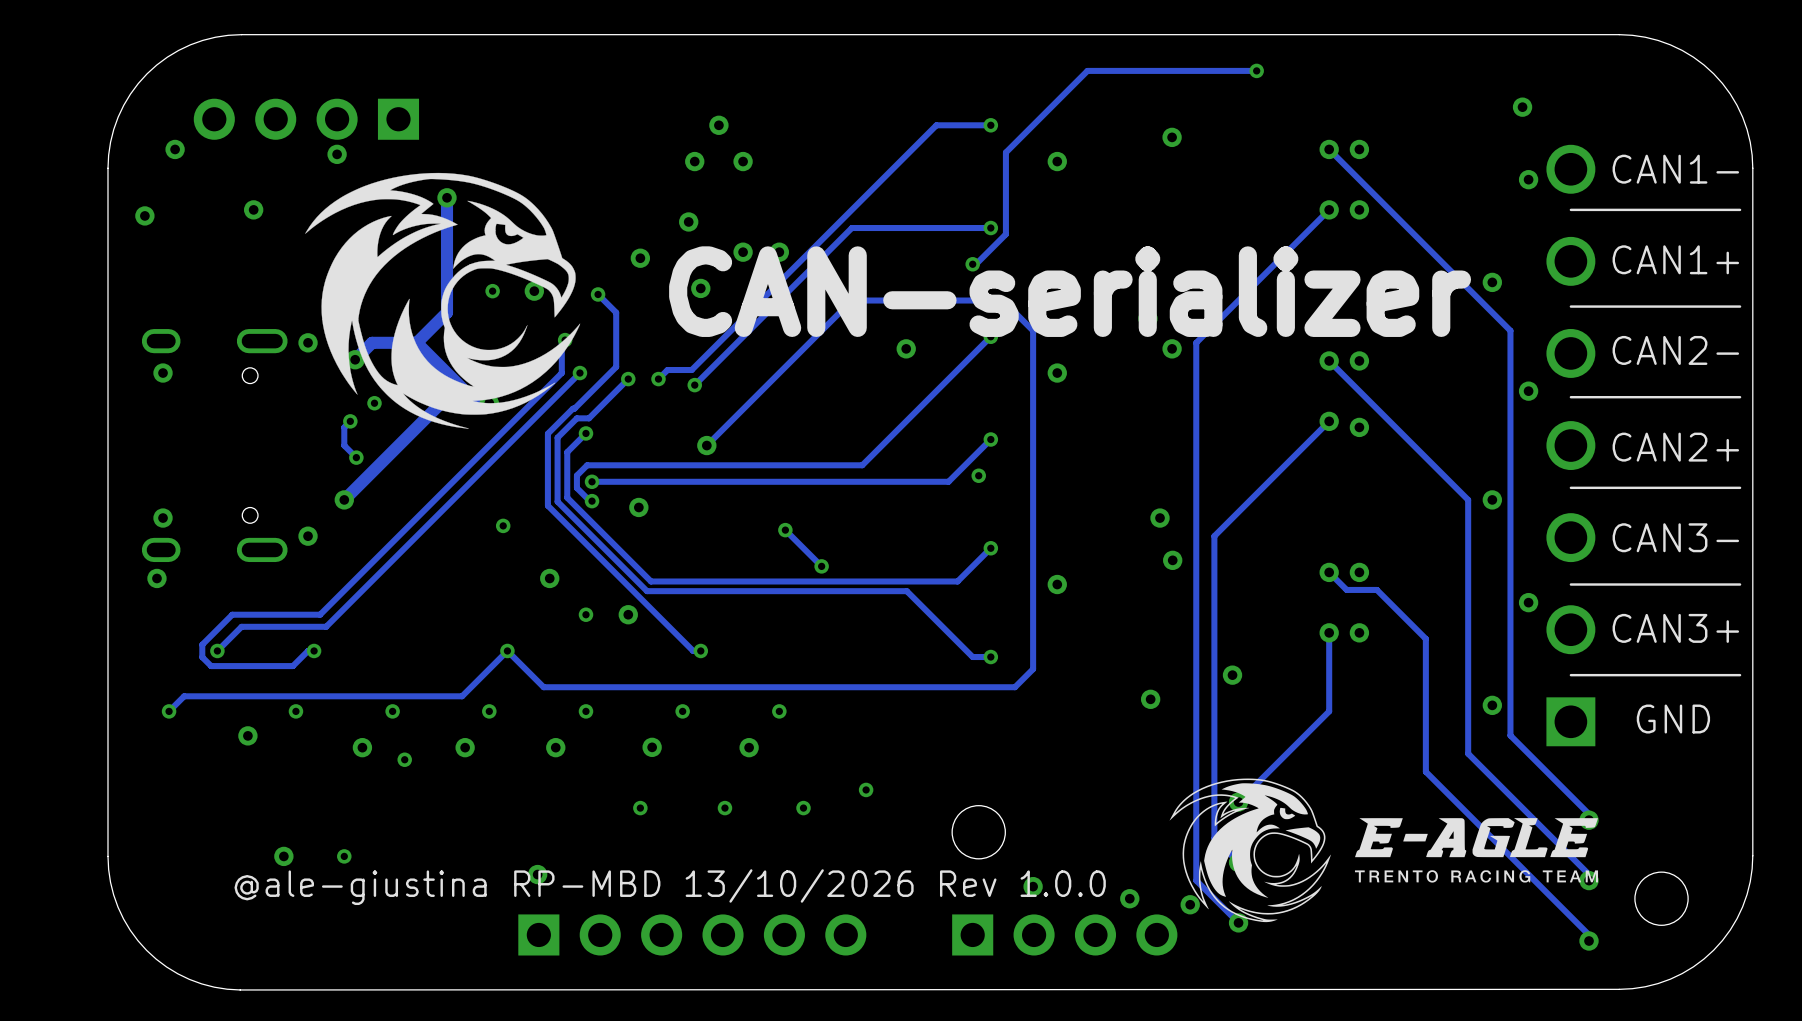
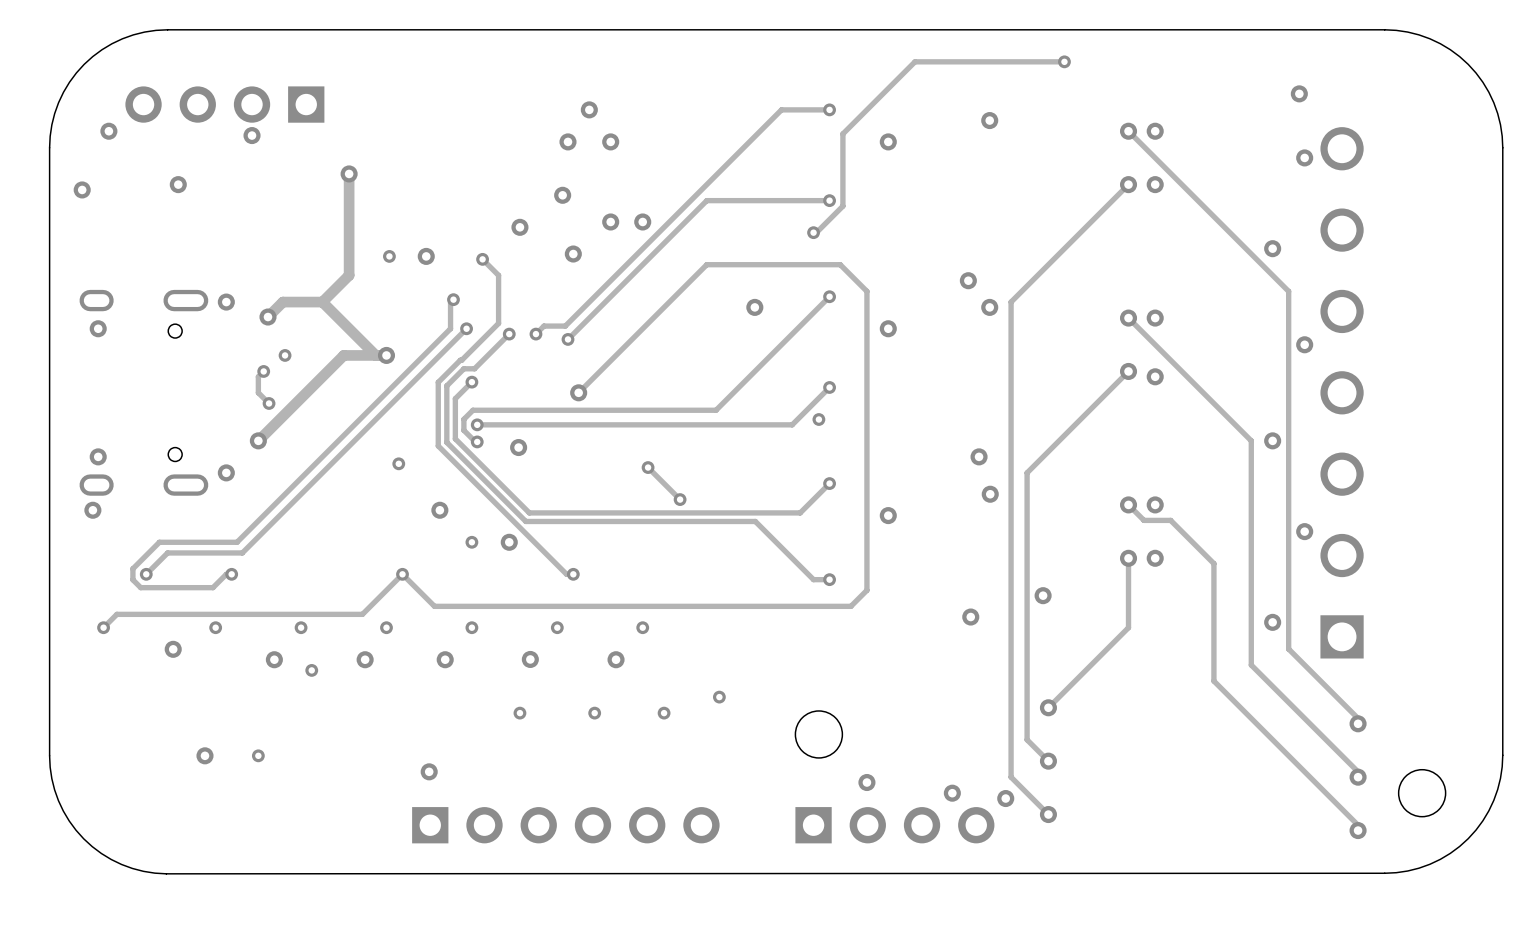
text: CAN1- (1675, 169) -> none
drawing: [305, 172, 581, 429] -> none
line: (1740, 209) (1570, 209) -> none
text: CAN1+ (1675, 259) -> none
text: CAN-serializer (1070, 291) -> none
line: (1740, 306) (1570, 306) -> none
text: CAN2- (1675, 350) -> none
line: (1740, 397) (1570, 397) -> none
text: CAN2+ (1675, 447) -> none
line: (1740, 487) (1570, 487) -> none
text: CAN3- (1675, 537) -> none
line: (1740, 584) (1570, 584) -> none
text: CAN3+ (1675, 628) -> none
line: (1740, 675) (1570, 675) -> none
text: GND (1673, 719) -> none
drawing: [1169, 778, 1599, 923] -> none
text: @ale-giustina RP-MBD 13/10/2026 Rev 1.0.0 (670, 887) -> none

